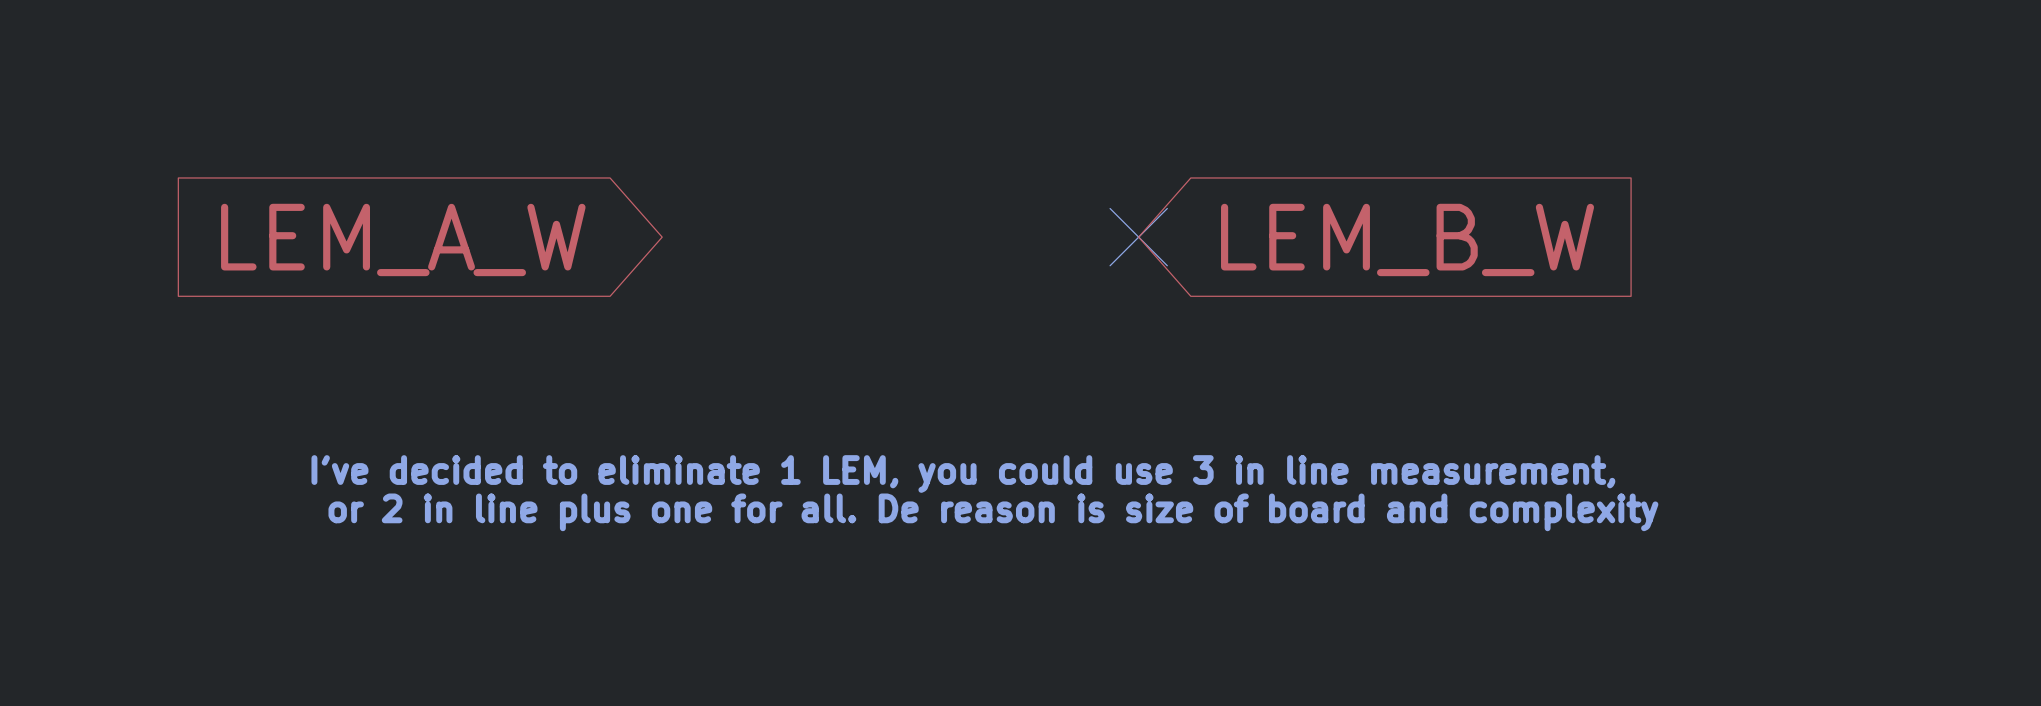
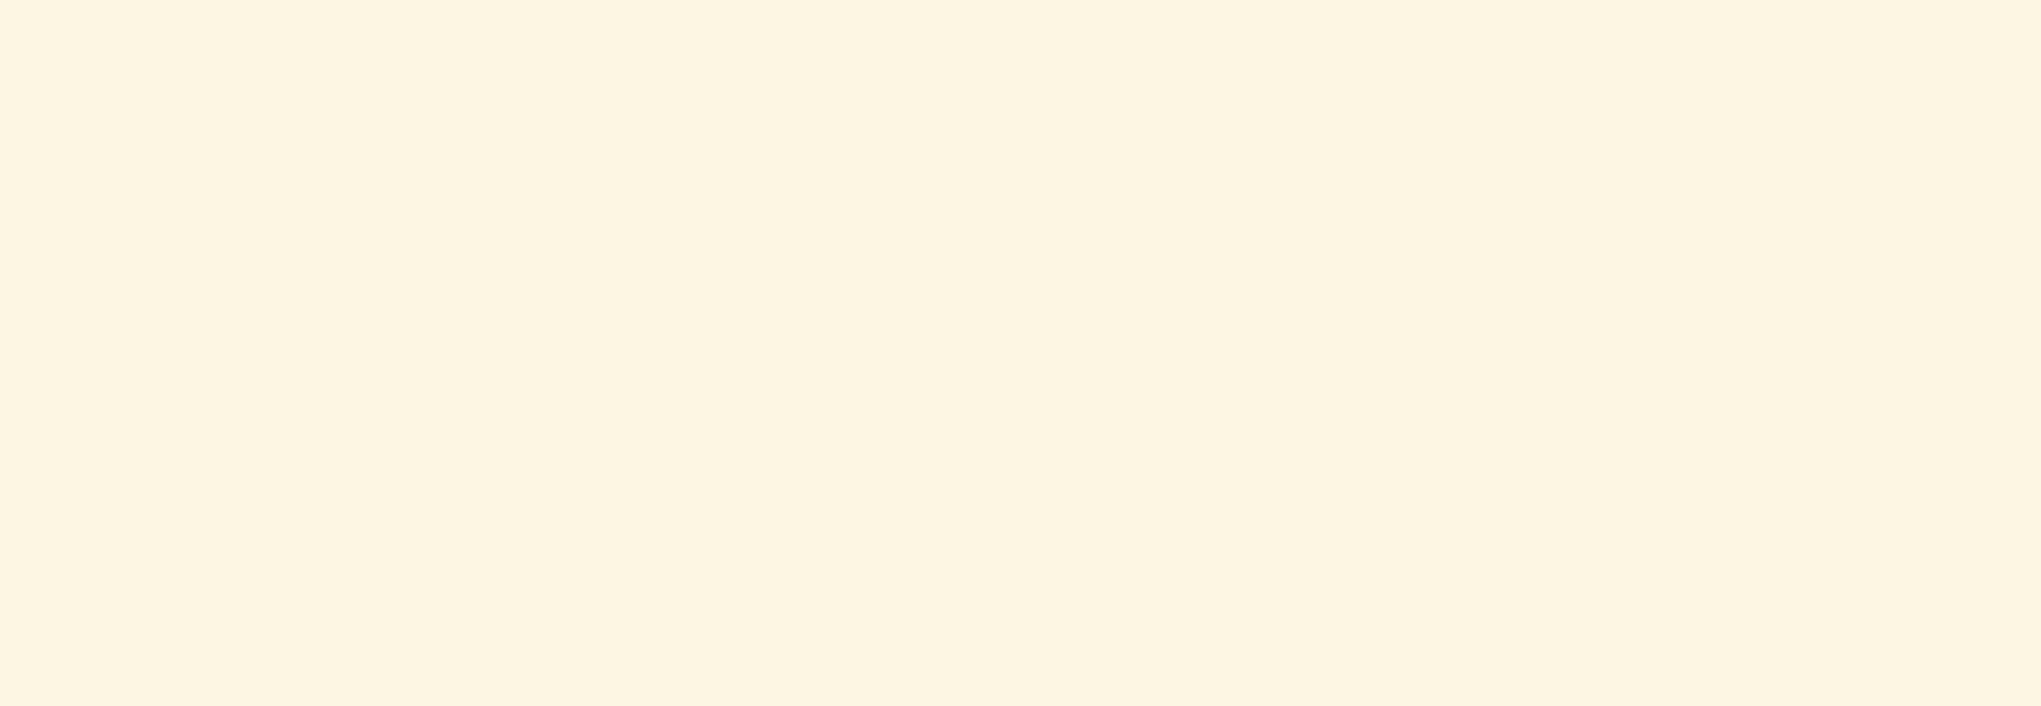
no-connect mark: (1138, 237) -> none
global label: LEM_A_W (403, 239) -> none
global label: LEM_B_W (1407, 239) -> none
text: I've decided to eliminate 1 LEM, you could use 3 in line measurement, (963, 474) -> none
text: or 2 in line plus one for all. De reason is size of board and complexity (993, 512) -> none

